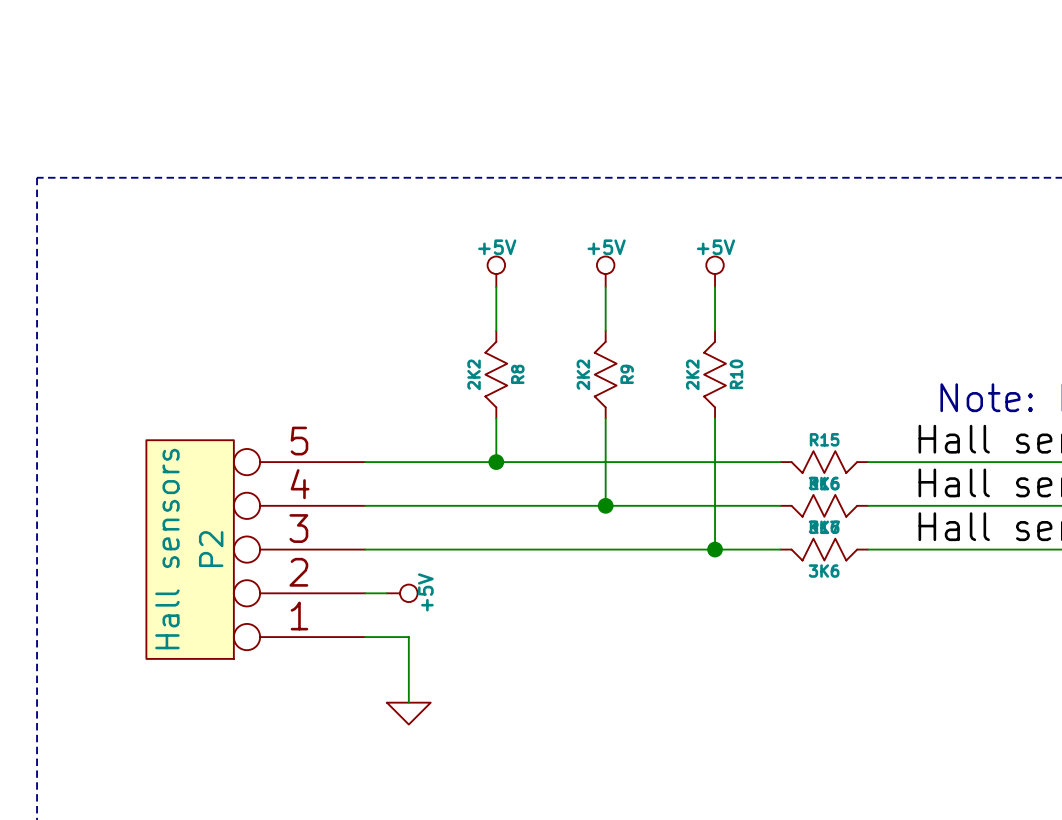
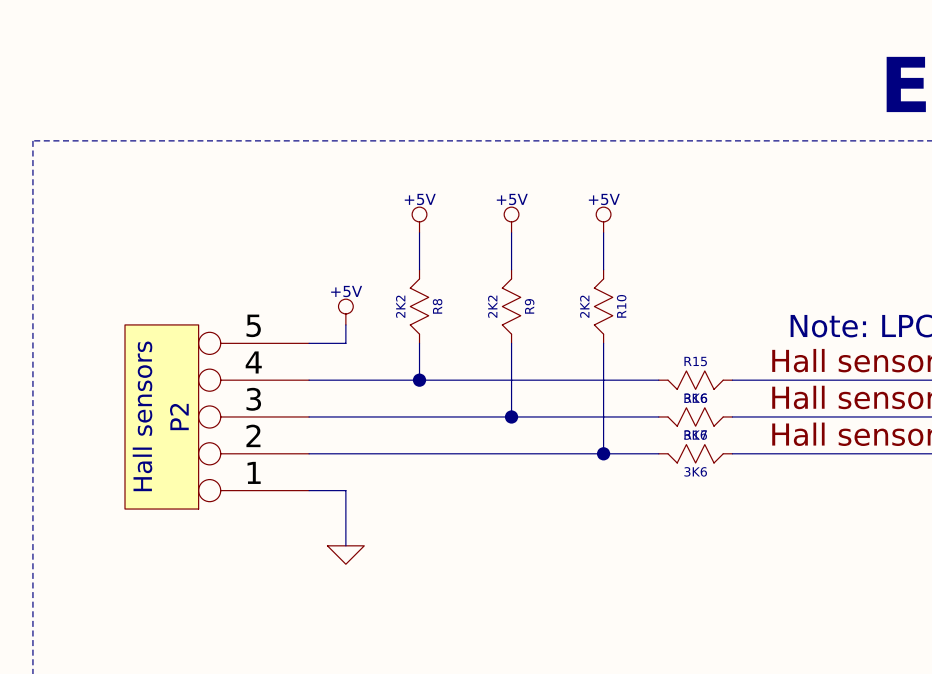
power symbol: none -> +5V (345, 312)
wire: none -> (345, 324) (345, 343) (309, 343)
P2 position: (255, 549) -> (217, 416)
power symbol: +5V (402, 593) -> none
wire: (365, 637) (408, 637) -> (327, 490) (345, 490) (345, 527)
wire: (408, 658) (408, 702) -> none
power symbol position: (408, 713) -> (345, 555)

